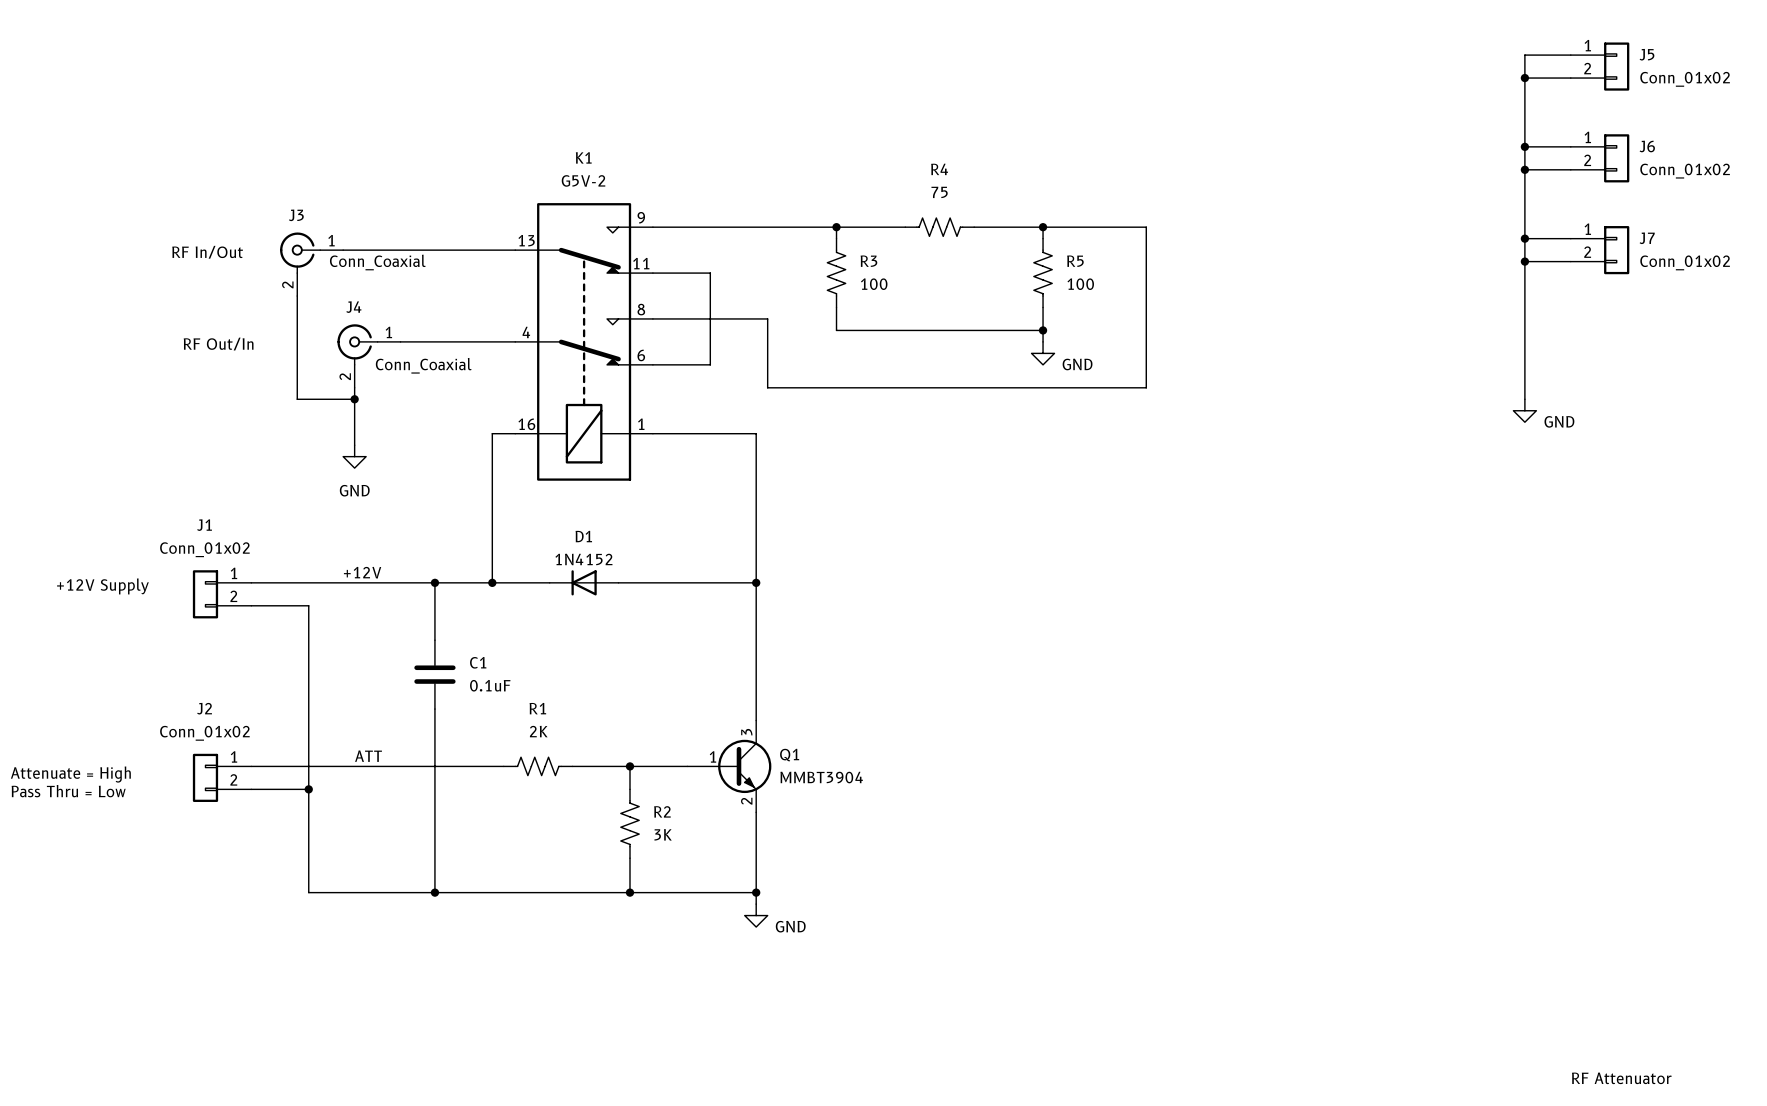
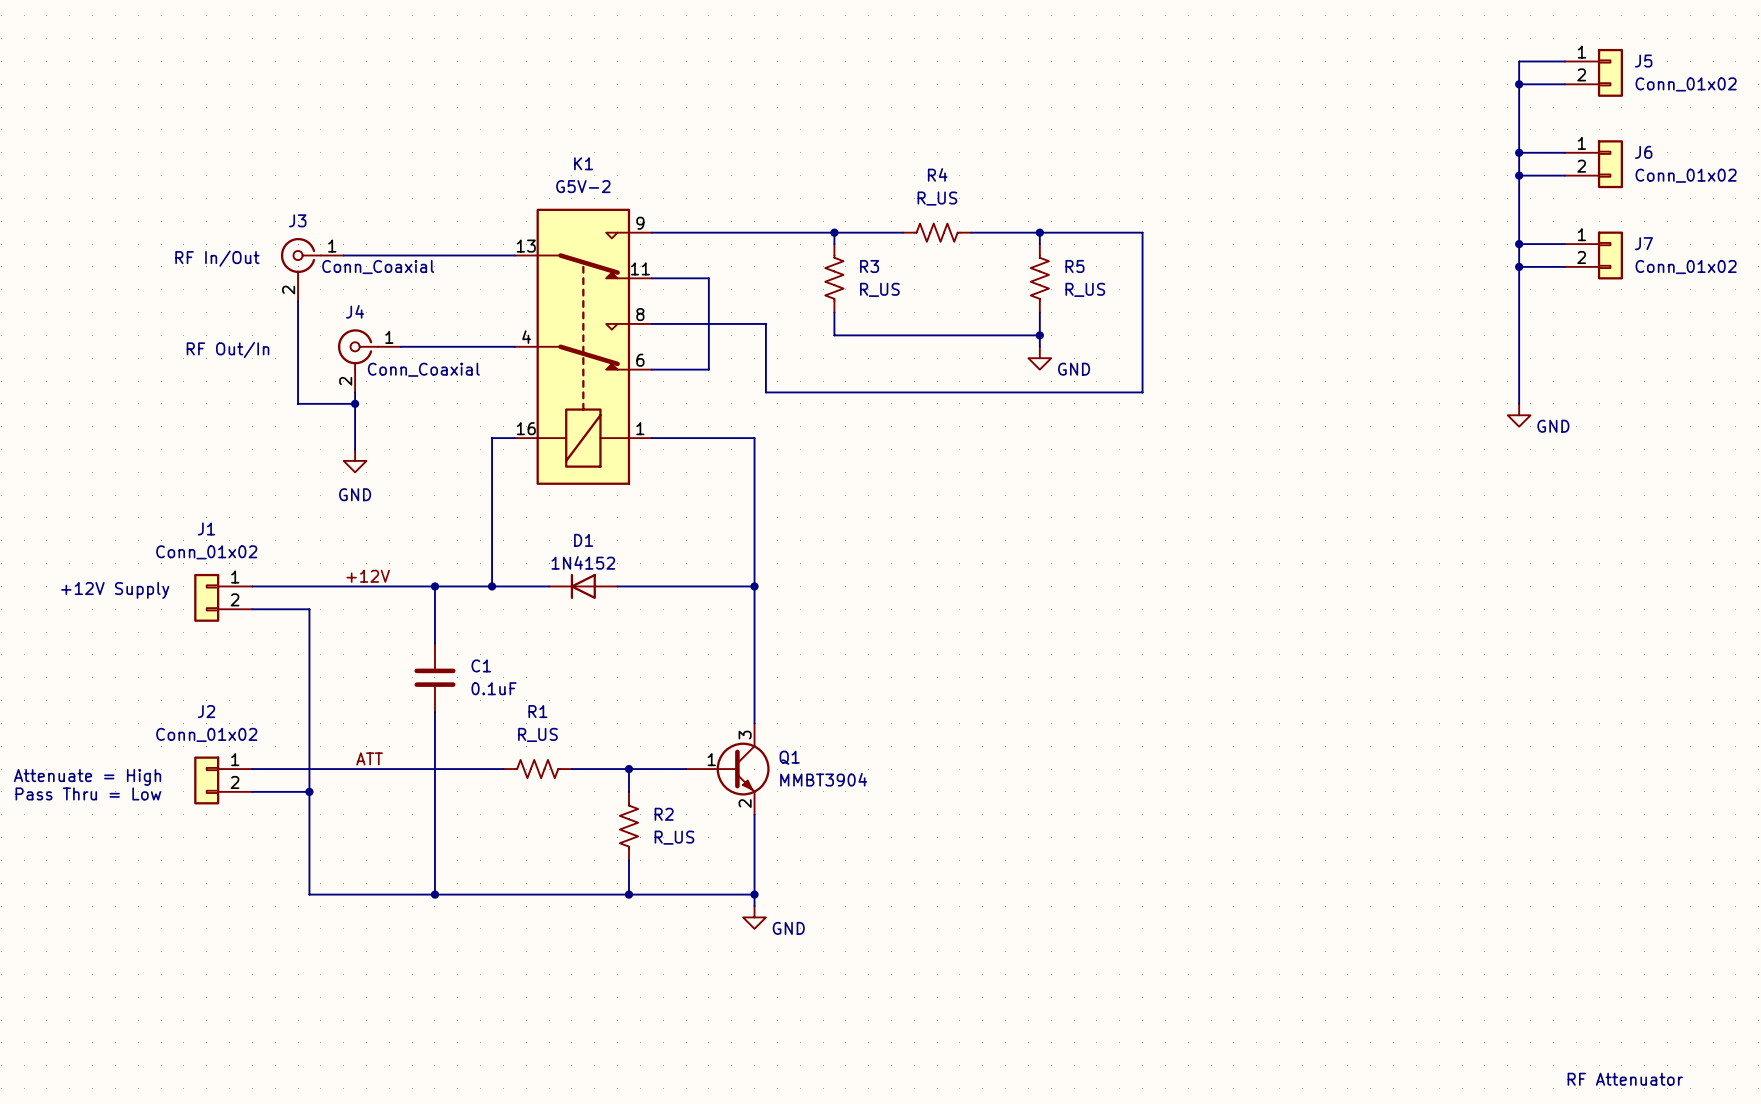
R4 value: 75 (939, 192) -> R_US (937, 198)
R3 value: 100 (874, 284) -> R_US (879, 289)
R5 value: 100 (1080, 284) -> R_US (1085, 289)
R1 value: 2K (538, 731) -> R_US (537, 734)
R2 value: 3K (663, 834) -> R_US (674, 837)

